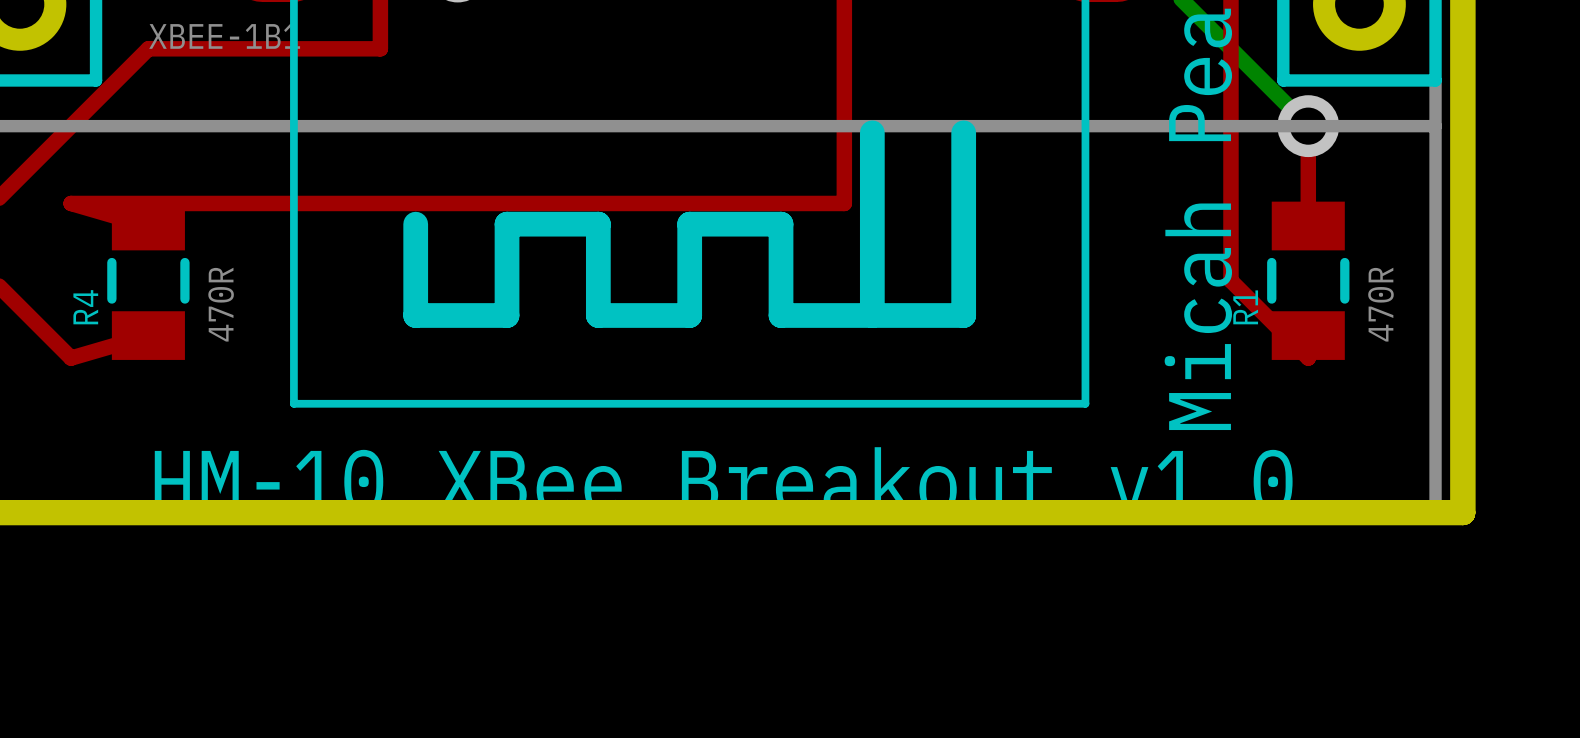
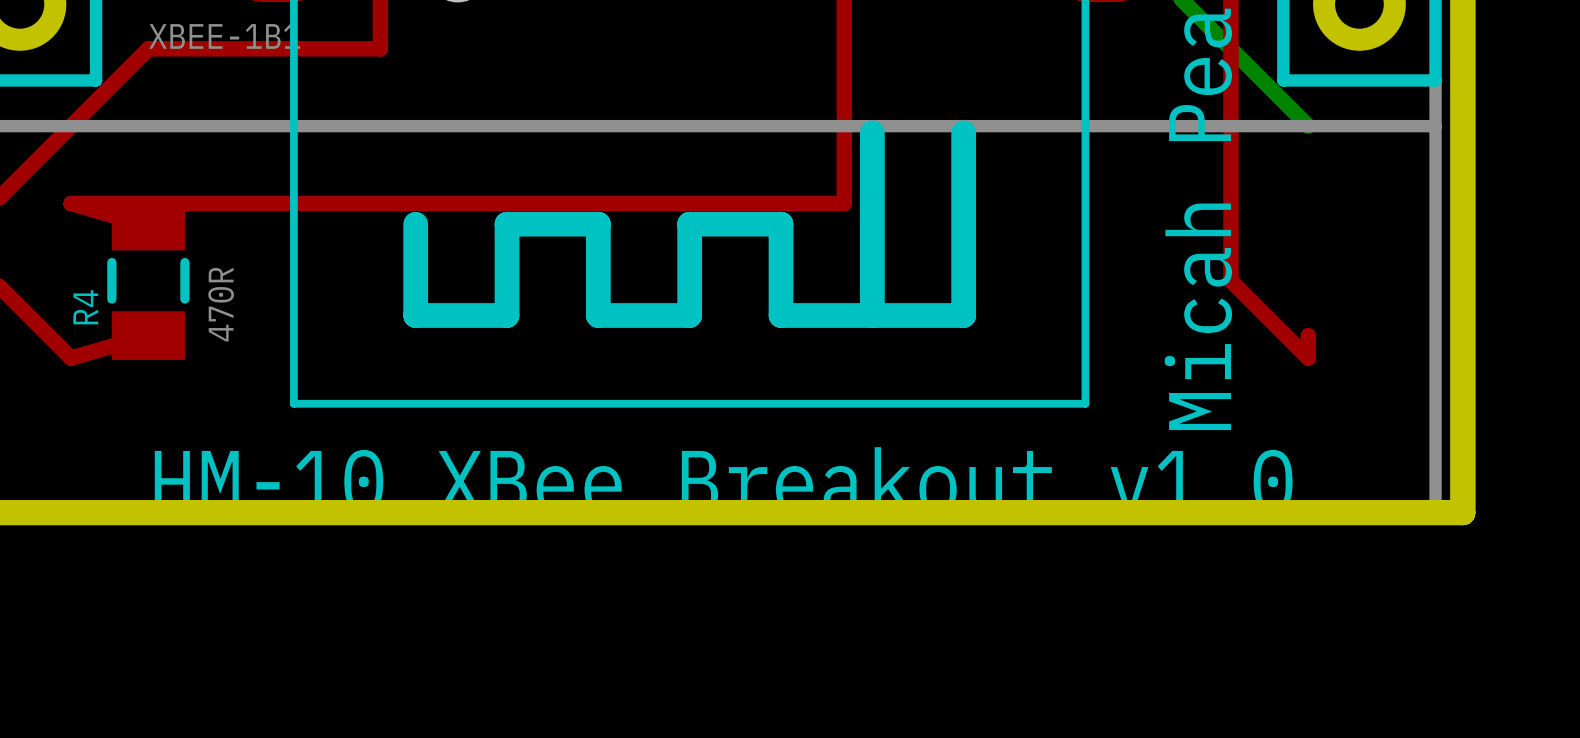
top track: (1308, 126) (1308, 226) -> none
via: (1308, 126) -> none
R1: 470R (1308, 280) -> none

